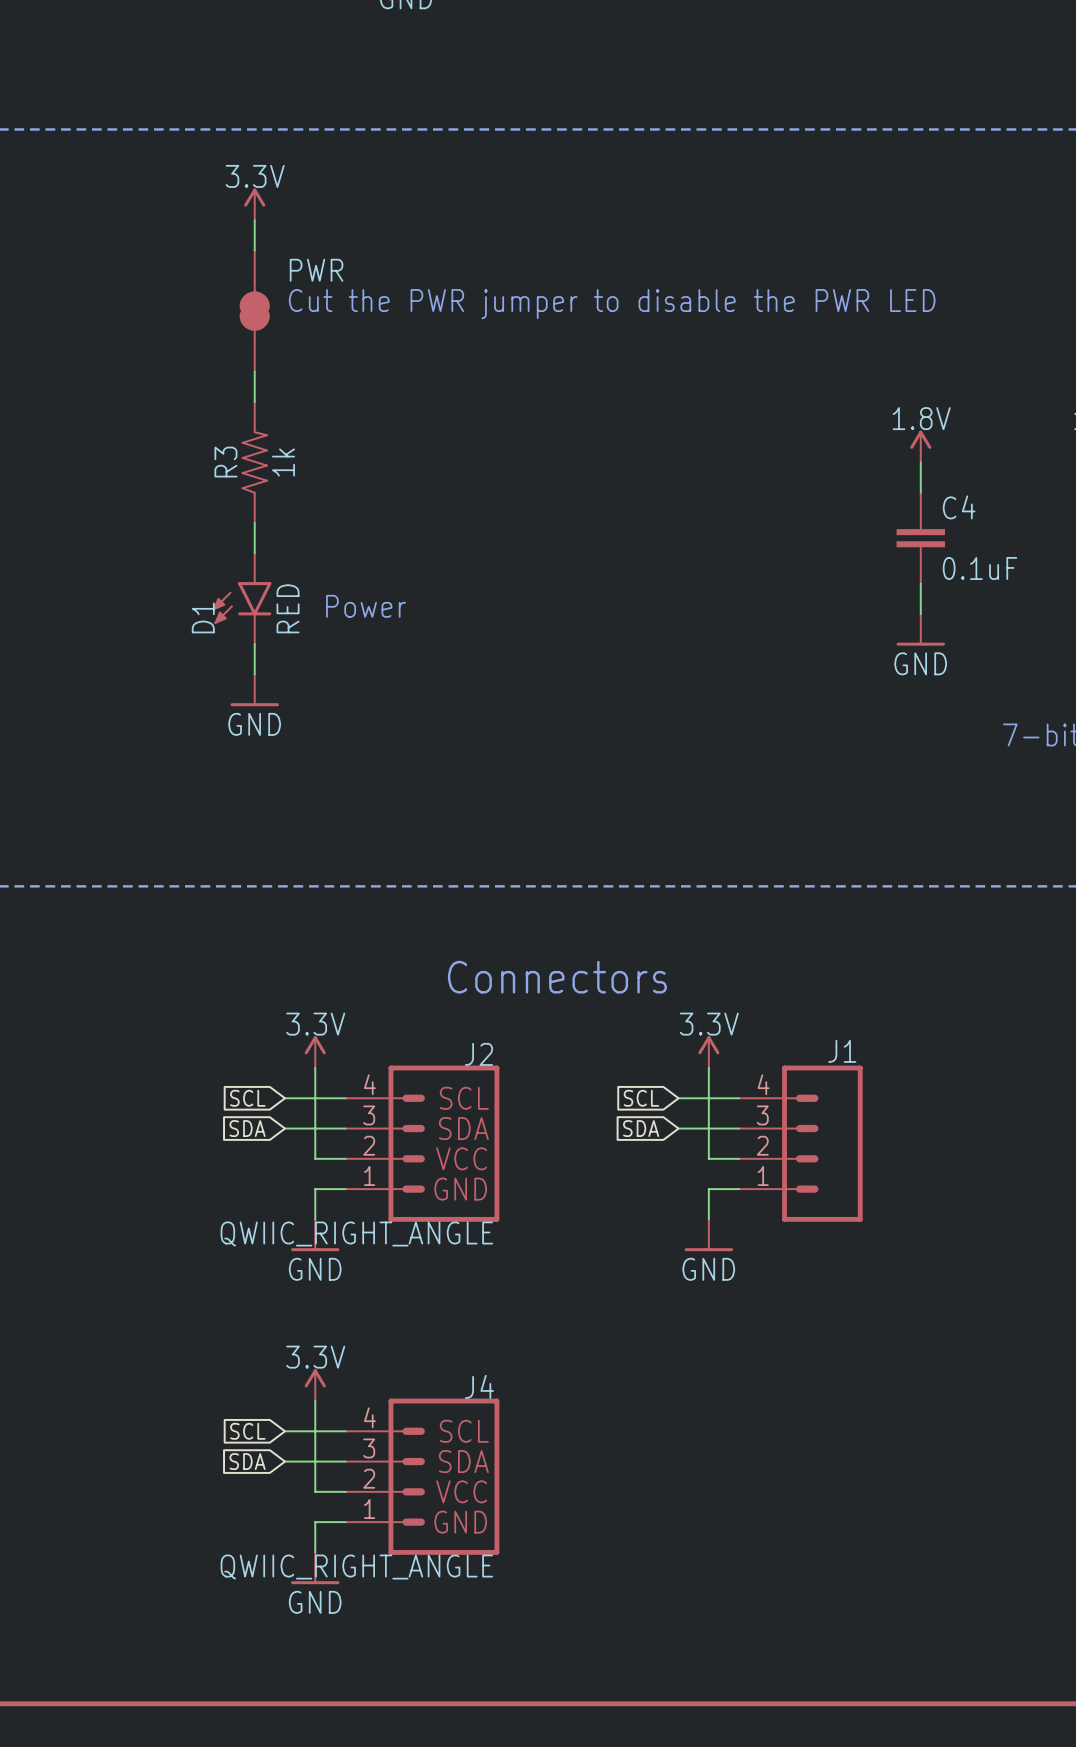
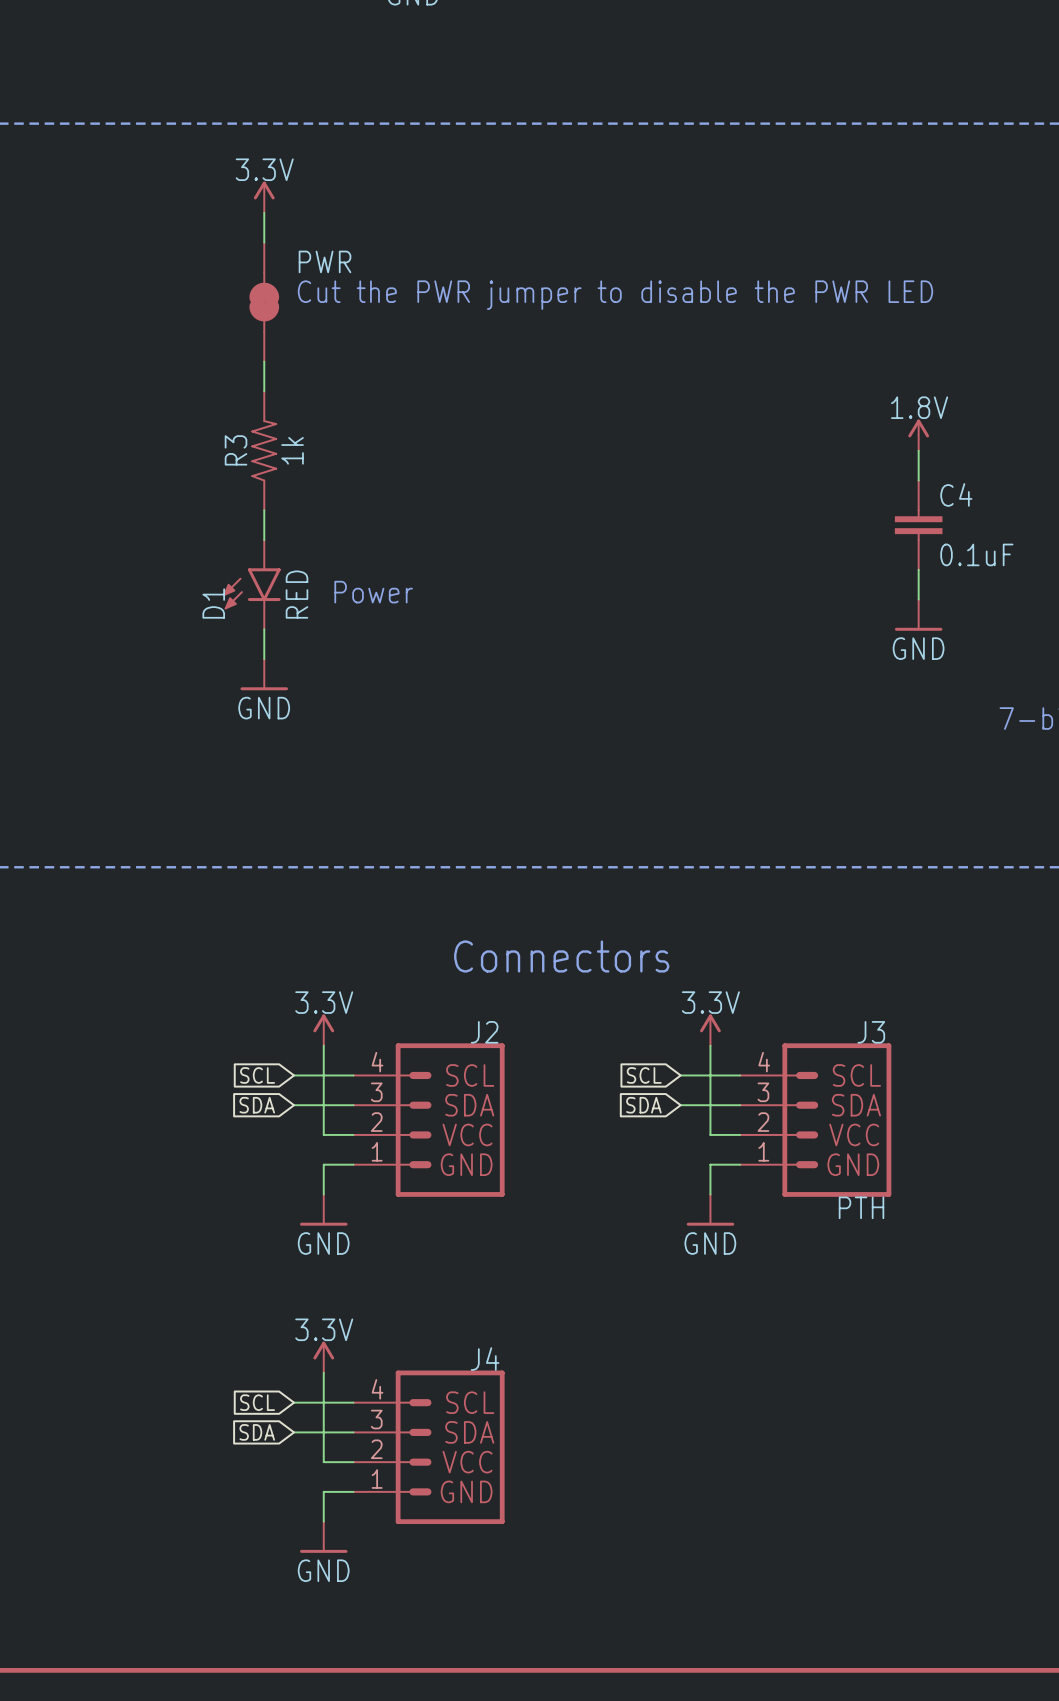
J1: (800, 1143) -> none
J3: none -> PTH (815, 1120)
J2 value: QWIIC_RIGHT_ANGLE (356, 1234) -> none
J4 value: QWIIC_RIGHT_ANGLE (356, 1567) -> none

